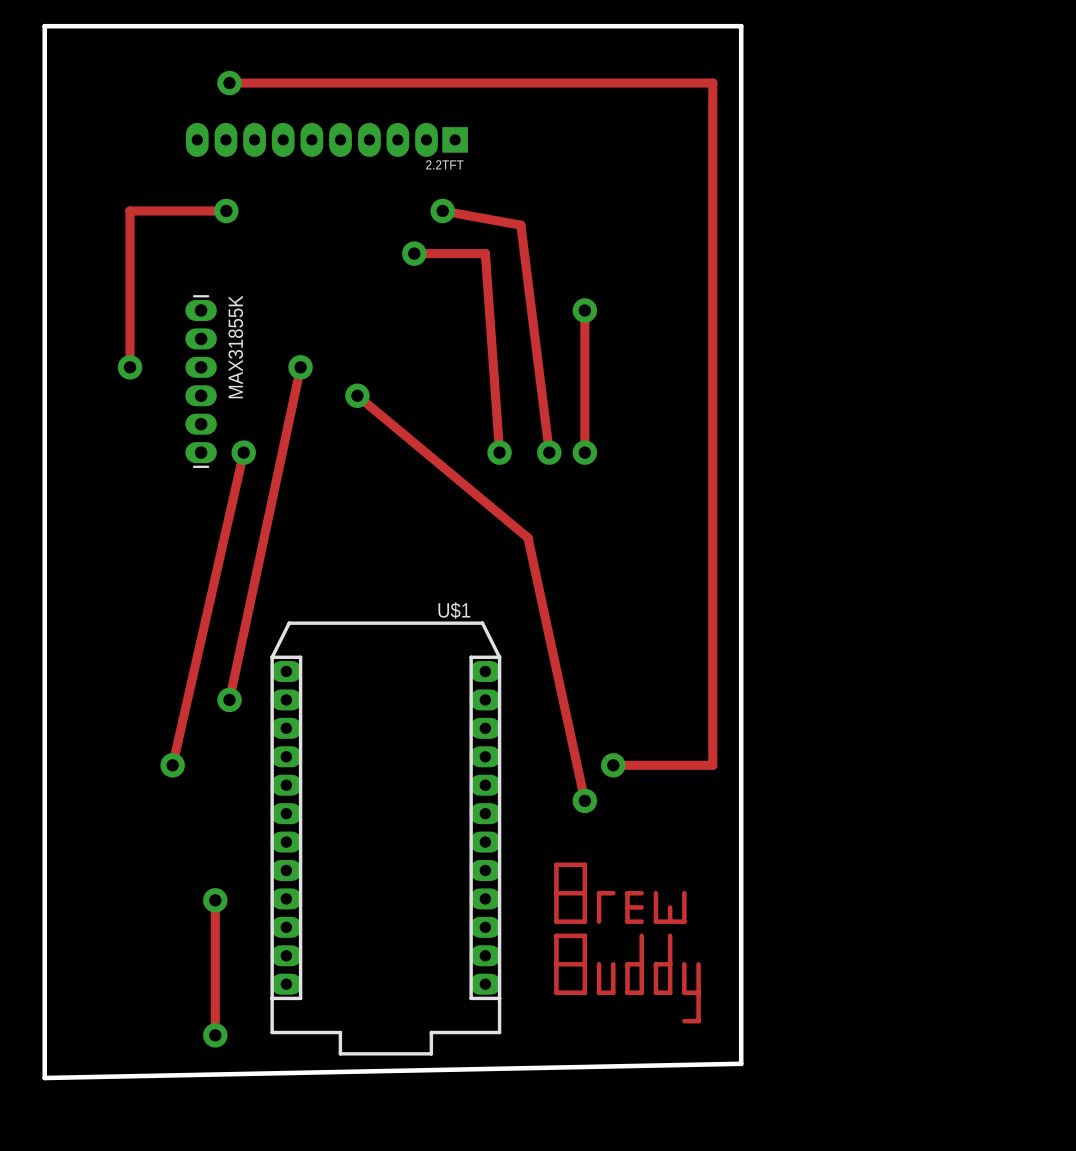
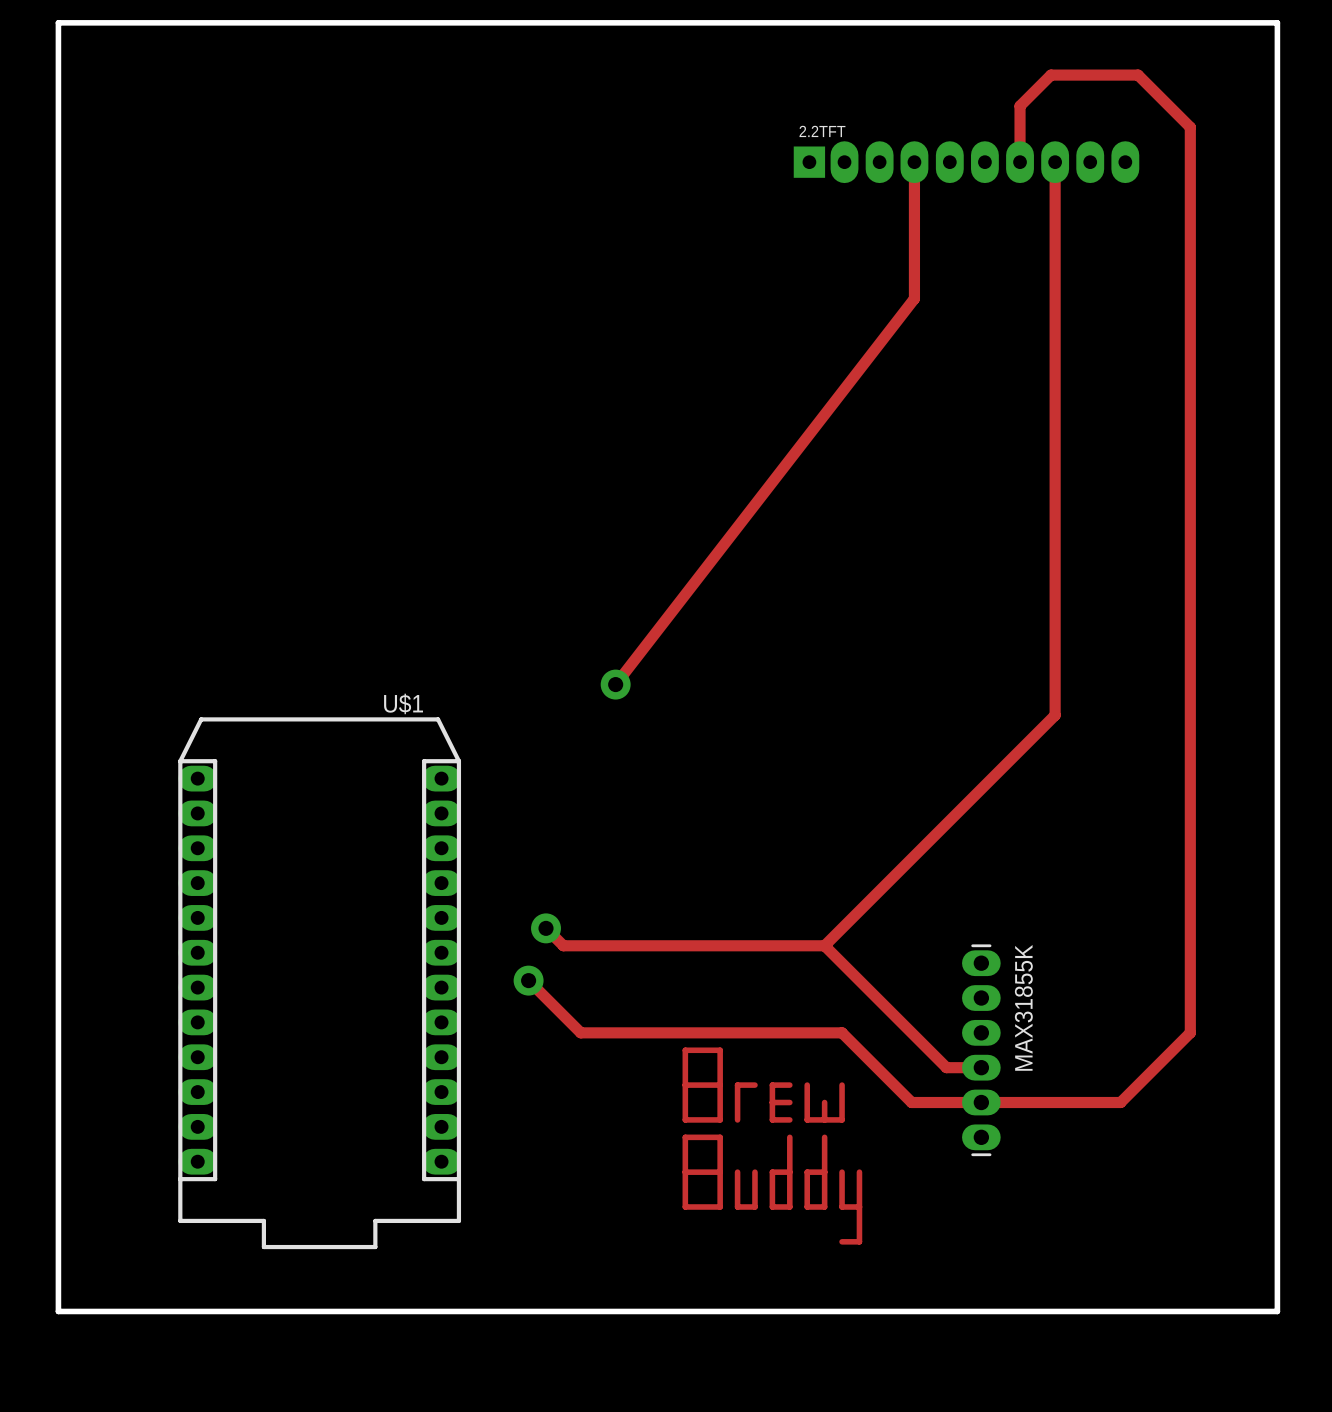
board edge: (741, 26) (741, 1063) (44, 1078) -> (911, 22) (1277, 22) (1277, 1311) (58, 1311)
track: (229, 83) (712, 83) (712, 765) (613, 765) -> none
via: (229, 83) -> none
2.2TFT rotation: 0° (326, 139) -> 180° (966, 162)
2.2TFT position: (326, 139) -> (966, 162)
track: none -> (914, 162) (914, 298) (615, 684)
track: none -> (1020, 162) (1020, 106) (1051, 75) (1138, 75) (1190, 127) (1190, 1032) (1120, 1102) (911, 1102) (842, 1032) (580, 1032) (528, 980)
track: none -> (1055, 162) (1055, 715) (824, 945)
track: (226, 210) (130, 210) (130, 367) -> none
via: (226, 210) -> none
track: (442, 210) (520, 225) (549, 452) -> none
via: (442, 210) -> none
track: (414, 253) (485, 253) (499, 452) -> none
via: (414, 253) -> none
track: (584, 310) (584, 452) -> none
via: (584, 310) -> none
via: (130, 367) -> none
track: (300, 367) (229, 699) -> none
via: (300, 367) -> none
MAX31855K position: (201, 381) -> (981, 1050)
track: (357, 395) (528, 537) (584, 800) -> none
via: (357, 395) -> none
track: (243, 452) (172, 765) -> none
via: (243, 452) -> none
via: (499, 452) -> none
via: (549, 452) -> none
via: (584, 452) -> none
via: none -> (615, 684)
via: (229, 699) -> none
via: (172, 765) -> none
track: none -> (546, 928) (563, 945) (824, 945)
via: none -> (546, 928)
via: (613, 765) -> none
track: none -> (824, 945) (946, 1067) (981, 1067)
via: (584, 800) -> none
via: none -> (528, 980)
U$1 position: (385, 838) -> (319, 983)
track: (215, 900) (215, 1035) -> none
via: (215, 900) -> none
via: (215, 1035) -> none

